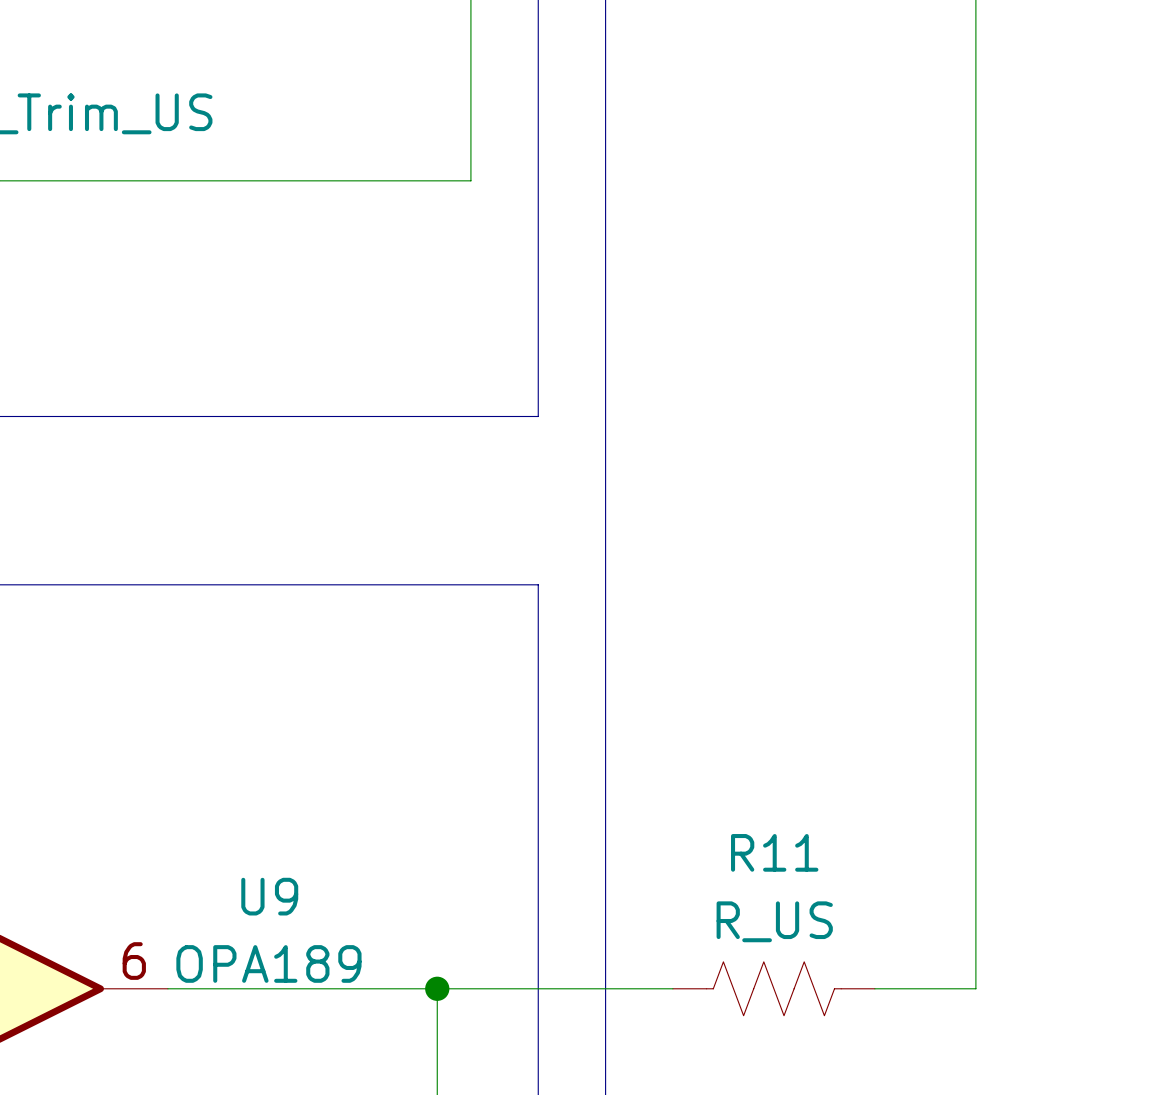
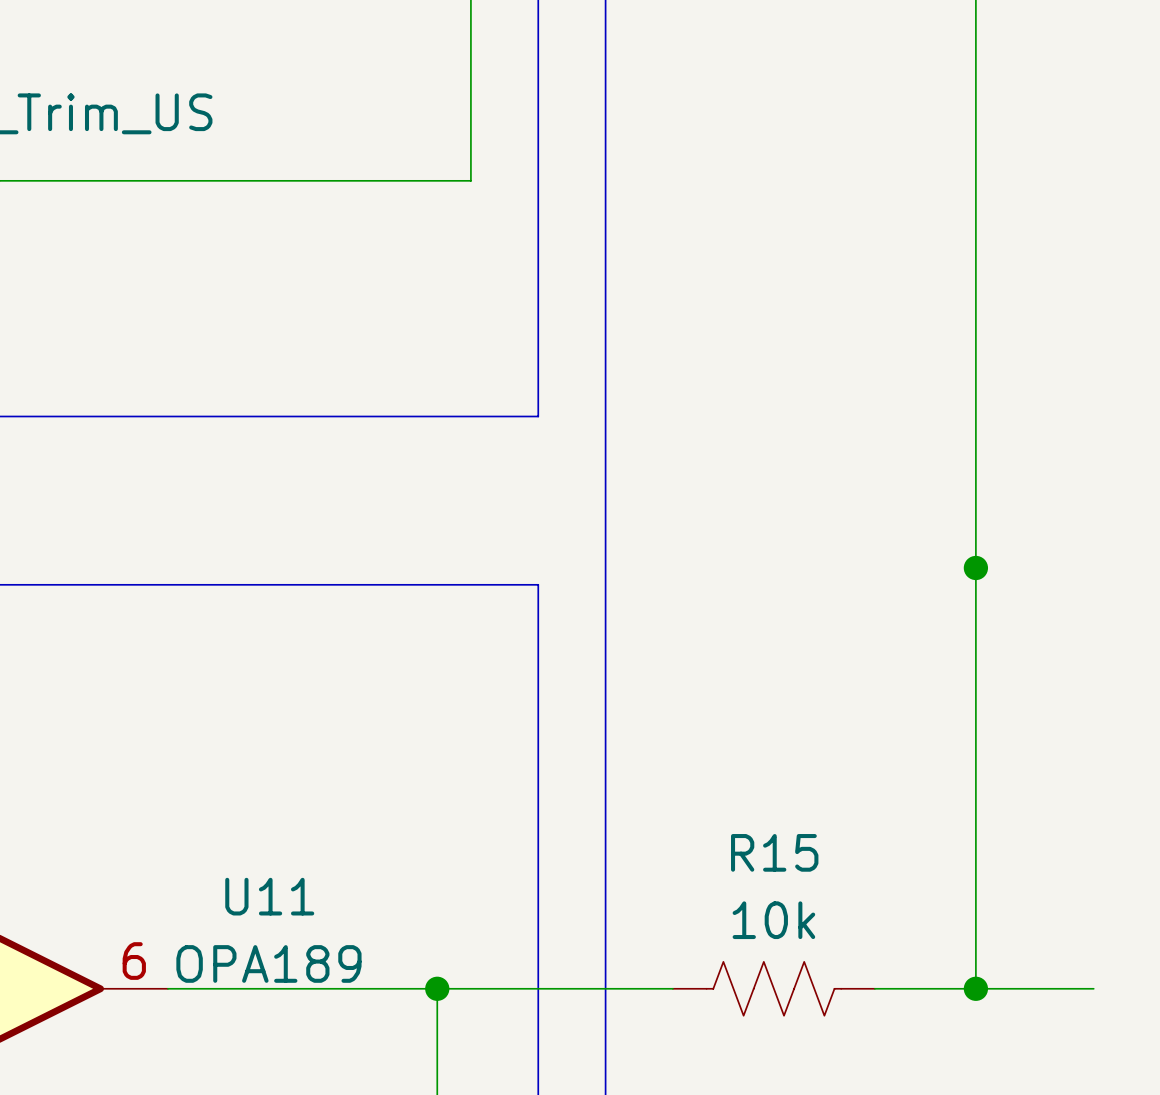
junction: none -> (975, 567)
R11 name: R11 (774, 852) -> R15 (774, 852)
U9 name: U9 (269, 896) -> U11 (269, 896)
R11 value: R_US (774, 921) -> 10k (773, 920)
wire: none -> (975, 988) (1093, 988)
junction: none -> (975, 988)

